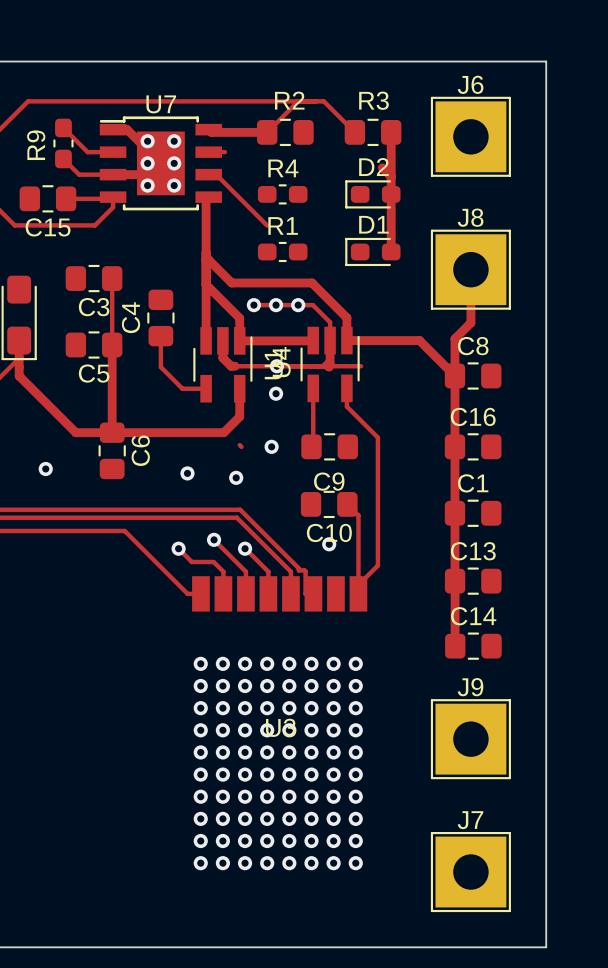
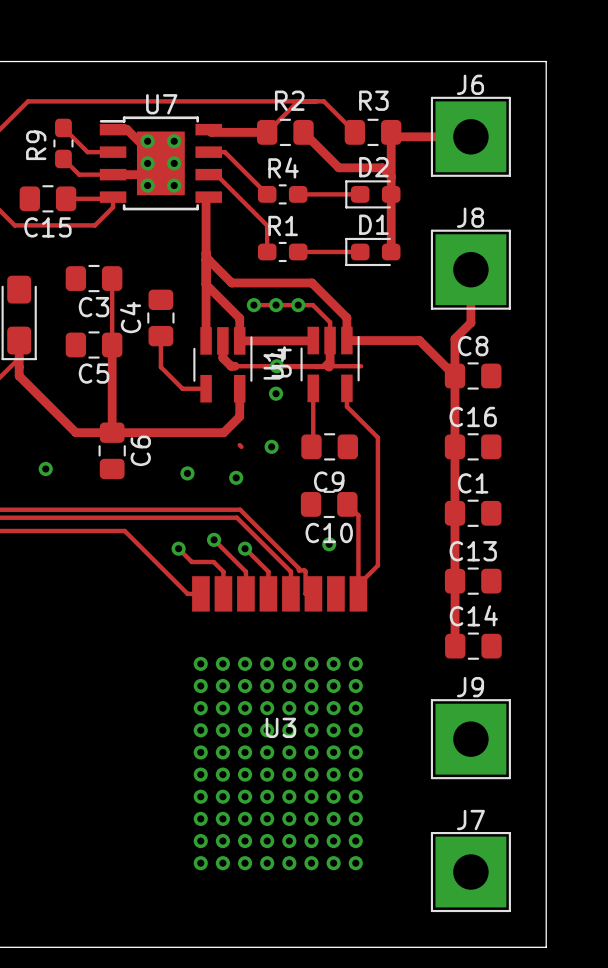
track: none -> (303, 132) (338, 167) (382, 167)
track: none -> (395, 136) (470, 136)
track: none -> (224, 152) (267, 194)
track: none -> (298, 194) (360, 194)
track: none -> (267, 225) (267, 251)
track: none -> (298, 251) (360, 251)

